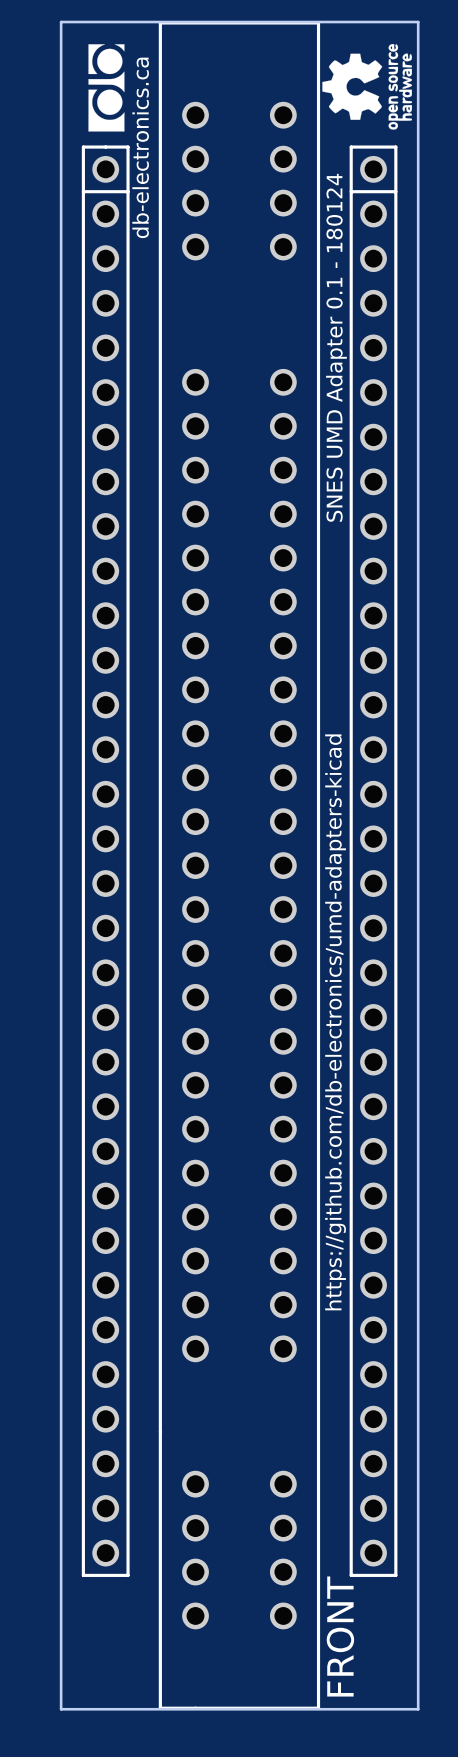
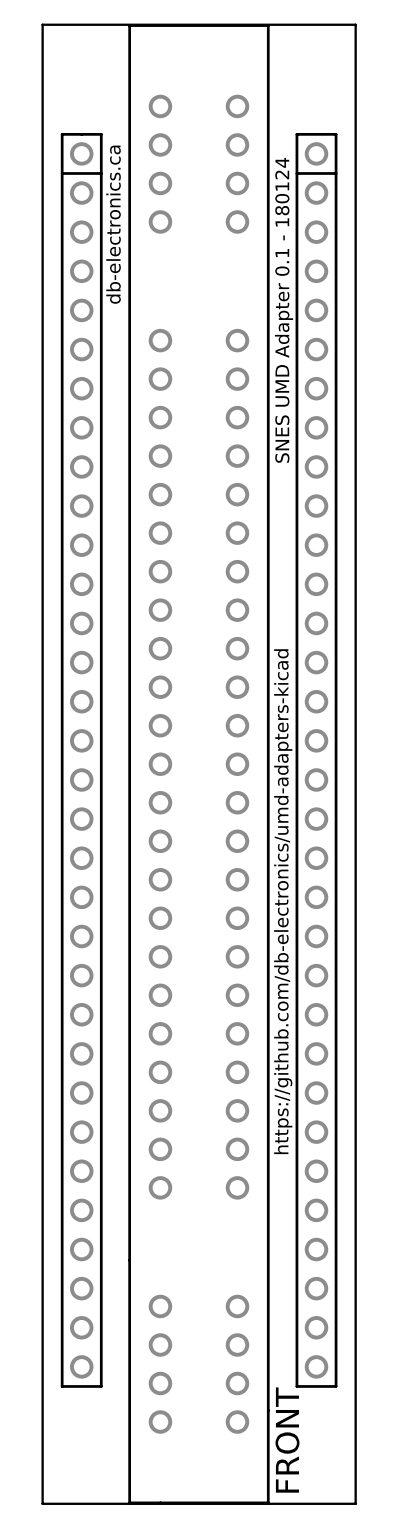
drawing: [88, 44, 125, 132] -> none
drawing: [322, 44, 413, 130] -> none
text position: db-electronics.ca (140, 147) -> db-electronics.ca (113, 224)

